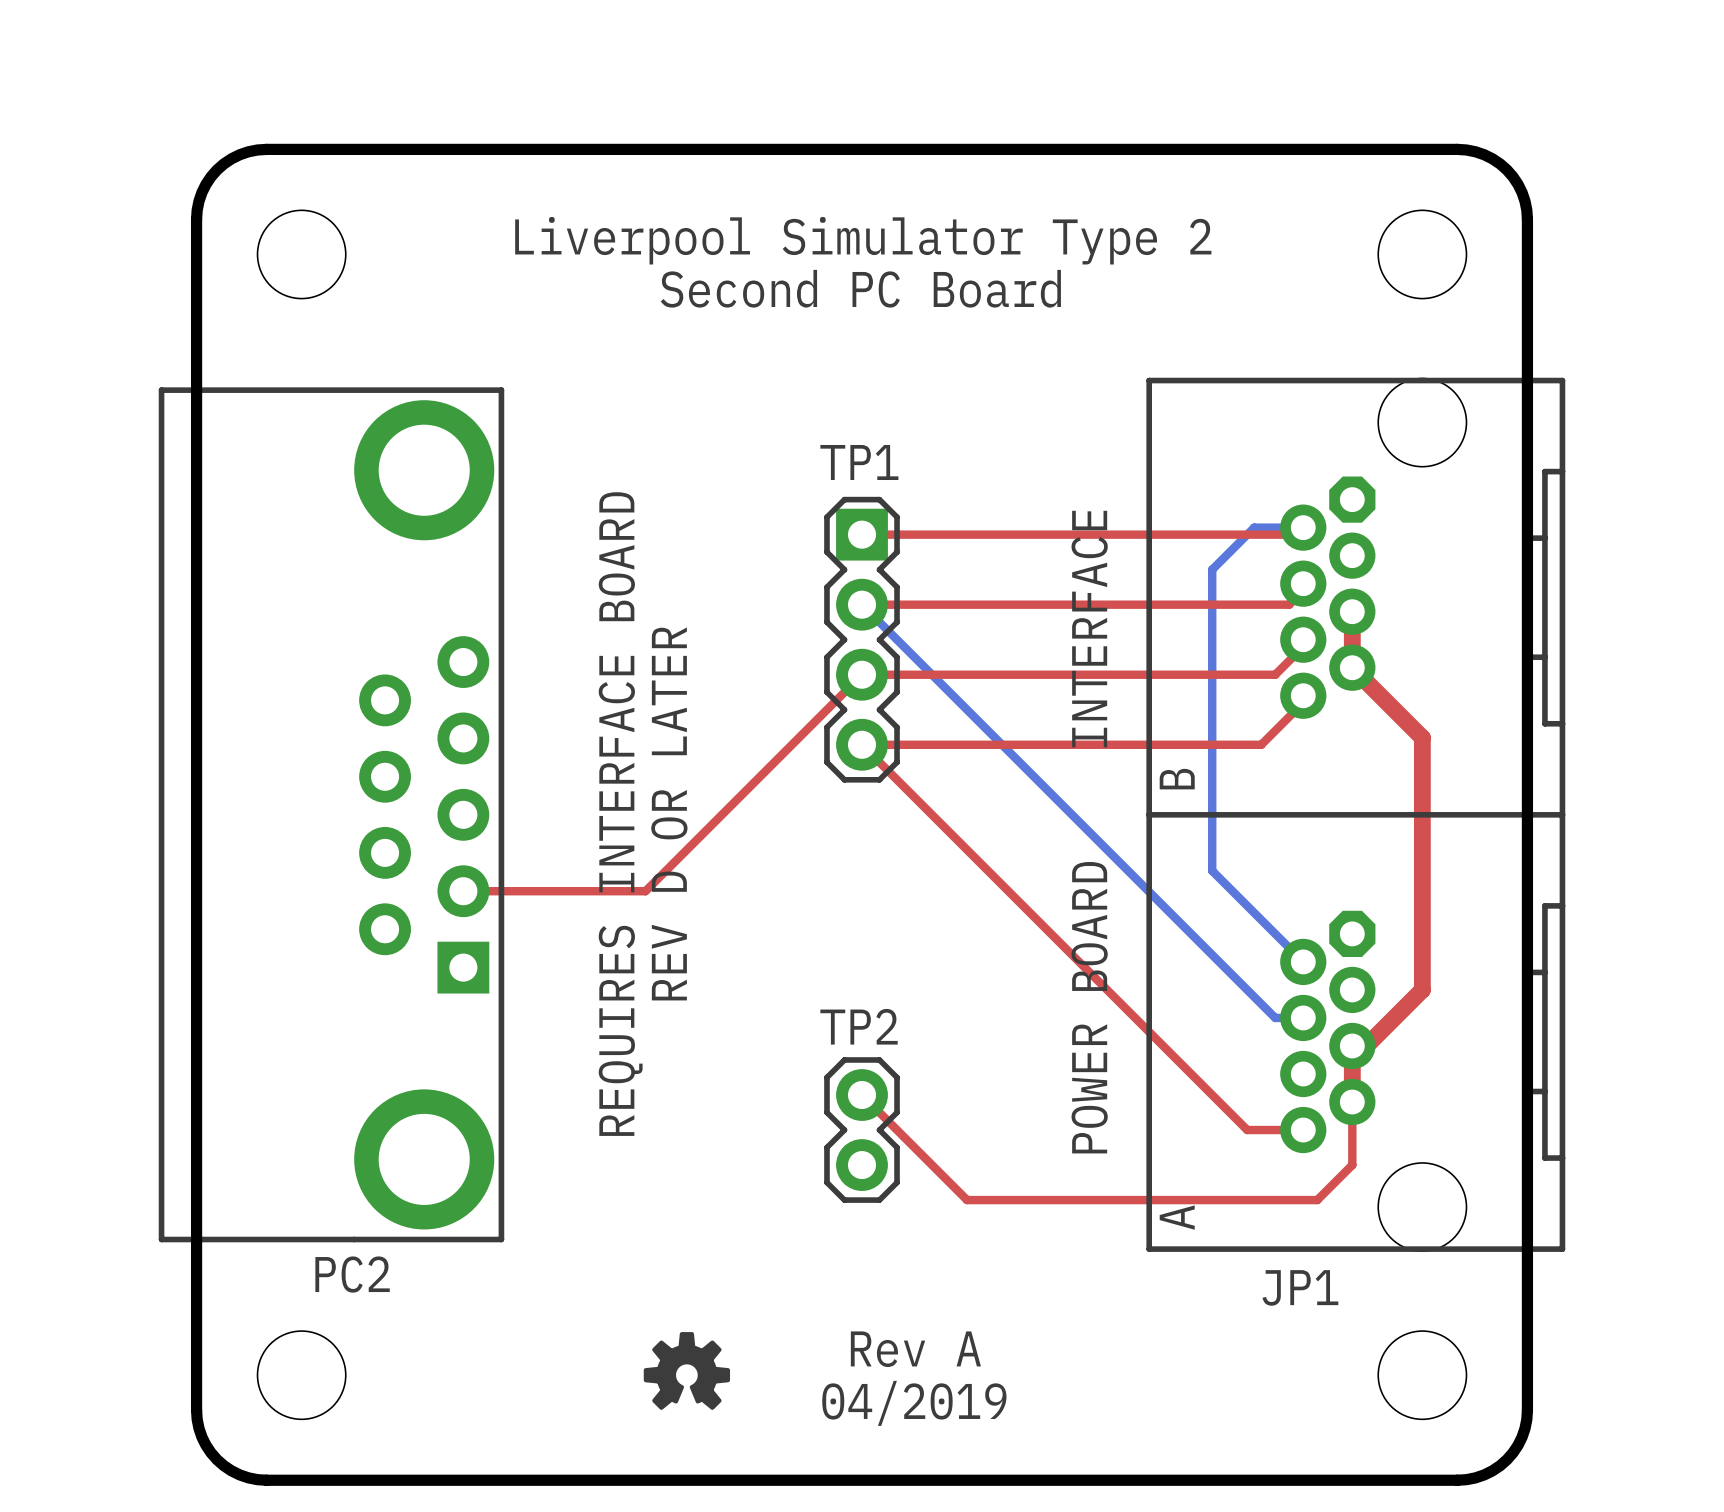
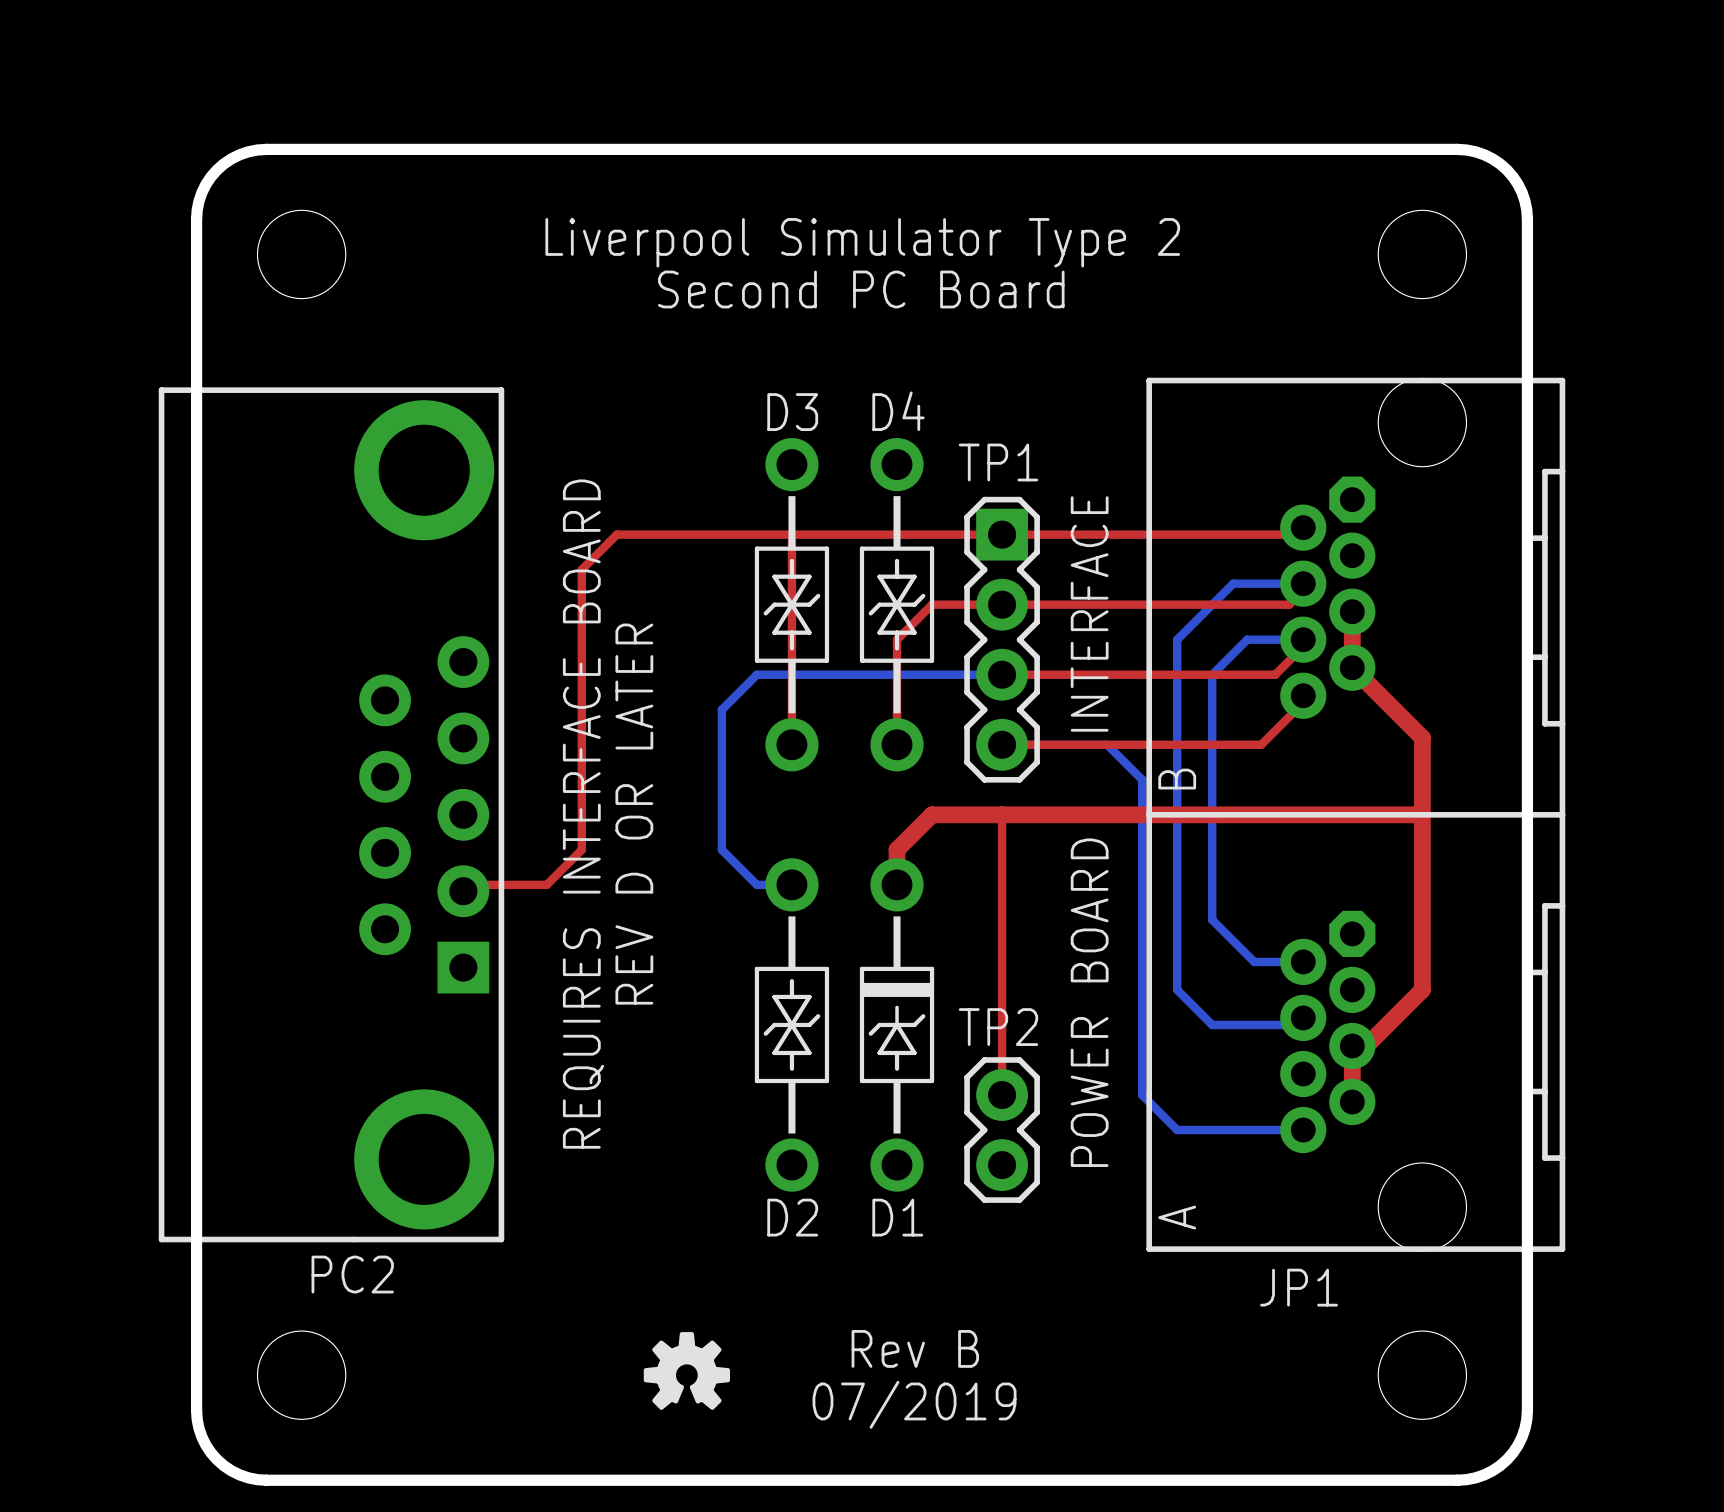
bottom track: (1303, 527) (1254, 527) (1212, 569) (1212, 674) -> (1303, 639) (1247, 639) (1212, 674)
top track: none -> (791, 534) (791, 744)
D3: none -> (791, 604)
top track: (862, 604) (932, 604) -> (897, 744) (897, 639) (932, 604)
bottom track: (862, 604) (1275, 1017) (1303, 1017) -> (1303, 583) (1233, 583) (1177, 639) (1177, 989) (1212, 1024) (1296, 1024) (1303, 1017)
D4: none -> (897, 604)
TP1 position: (862, 639) -> (1002, 639)
top track: (1002, 674) (862, 674) (645, 891) (463, 891) -> (862, 534) (616, 534) (581, 569) (581, 849) (546, 884) (469, 884) (463, 891)
bottom track: none -> (1002, 674) (756, 674) (721, 709) (721, 849) (756, 884) (791, 884)
top track: (1002, 744) (862, 744) (1247, 1130) (1303, 1130) -> none
bottom track: none -> (1002, 744) (1107, 744) (1142, 779) (1142, 1095) (1177, 1130) (1303, 1130)
text position: REV D OR LATER (669, 813) -> REV D OR LATER (634, 814)
text position: REQUIRES INTERFACE BOARD (620, 814) -> REQUIRES INTERFACE BOARD (583, 814)
top track: none -> (1002, 814) (1002, 1095)
top track: none -> (1422, 814) (932, 814) (897, 849) (897, 884)
bottom track: (1212, 870) (1303, 961) -> (1212, 870) (1212, 919) (1254, 961) (1303, 961)
D2: none -> (791, 1024)
D1: none -> (897, 1024)
top track: (862, 1095) (967, 1200) (1317, 1200) (1352, 1165) (1352, 1102) -> none
TP2 position: (862, 1130) -> (1002, 1130)
text: Rev A (915, 1349) -> Rev B (915, 1348)
text: 04/2019 (914, 1403) -> 07/2019 (914, 1404)

